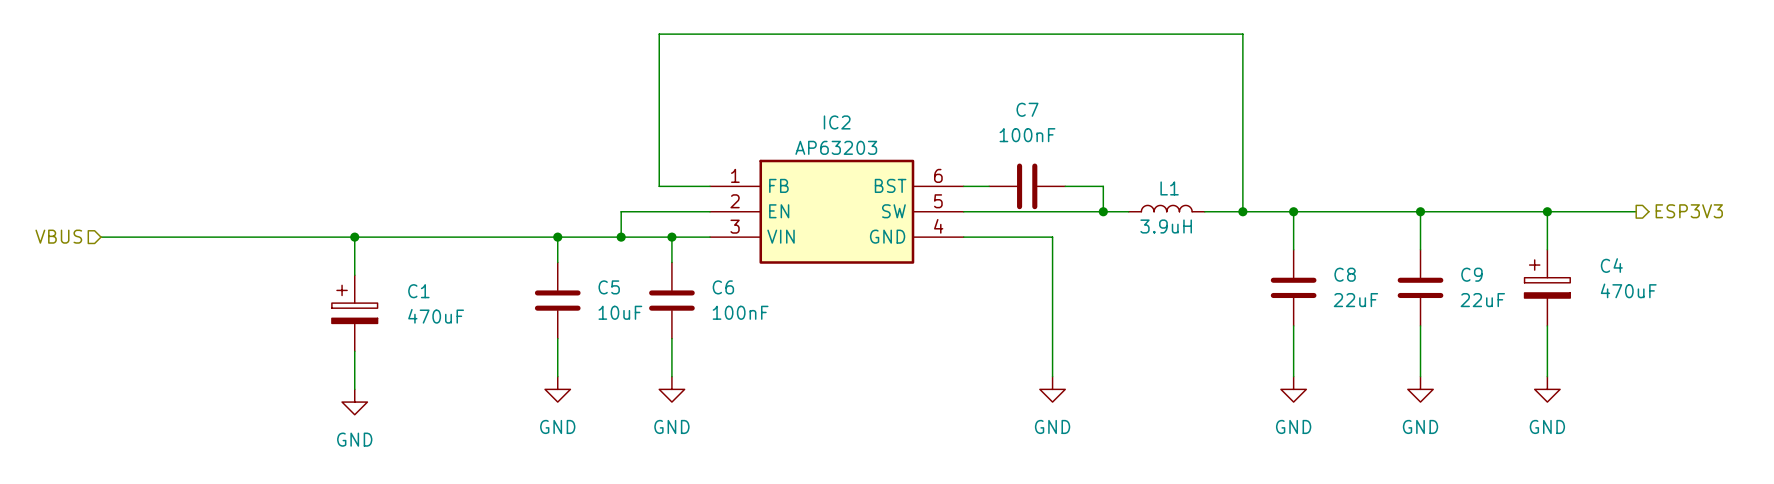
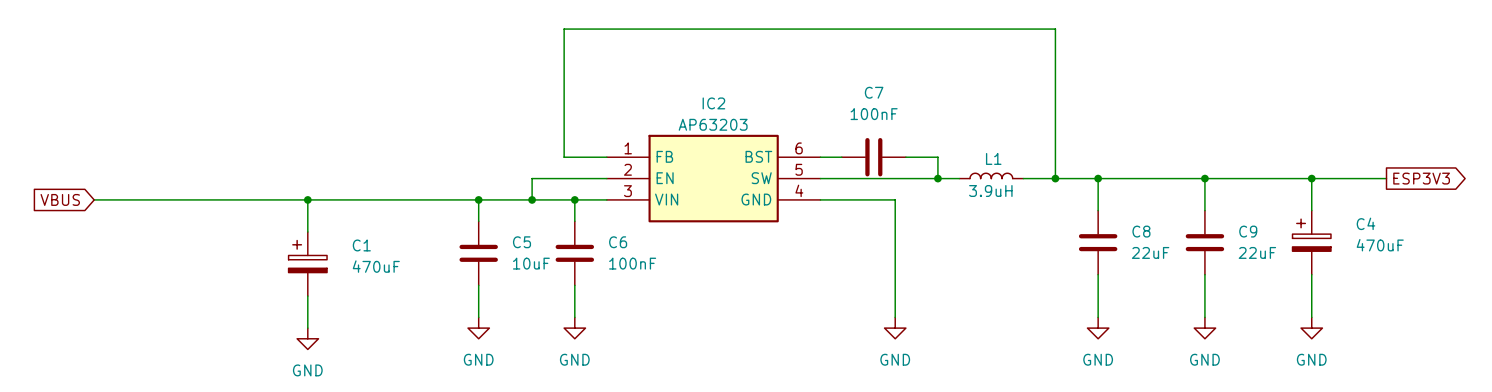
global label: none -> ESP3V3 (1421, 178)
hierarchical label: ESP3V3 (1689, 211) -> none
hierarchical label: VBUS (58, 236) -> none
global label: none -> VBUS (60, 199)

